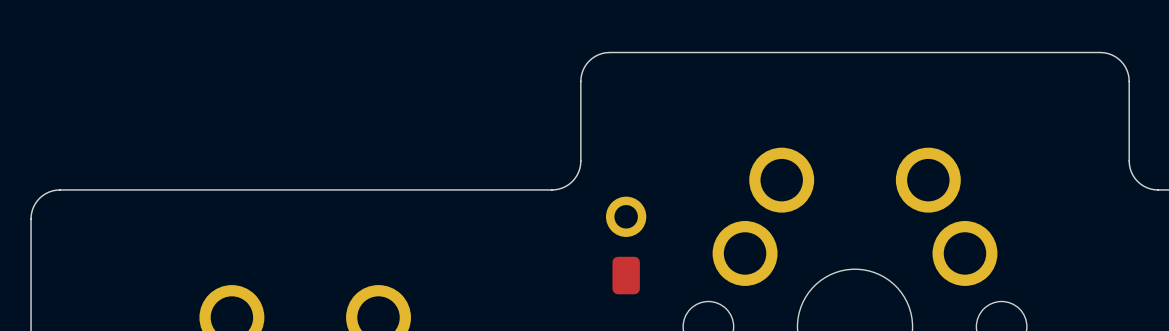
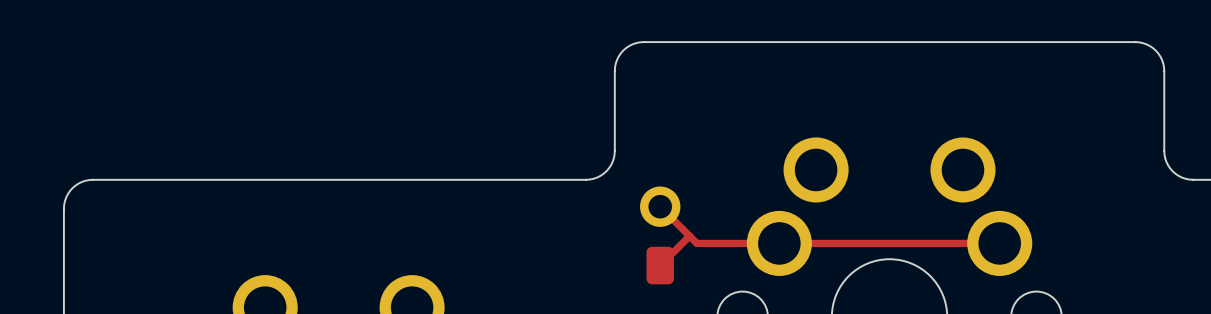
track: none -> (660, 206) (696, 243) (999, 243)
track: none -> (689, 236) (660, 265)

